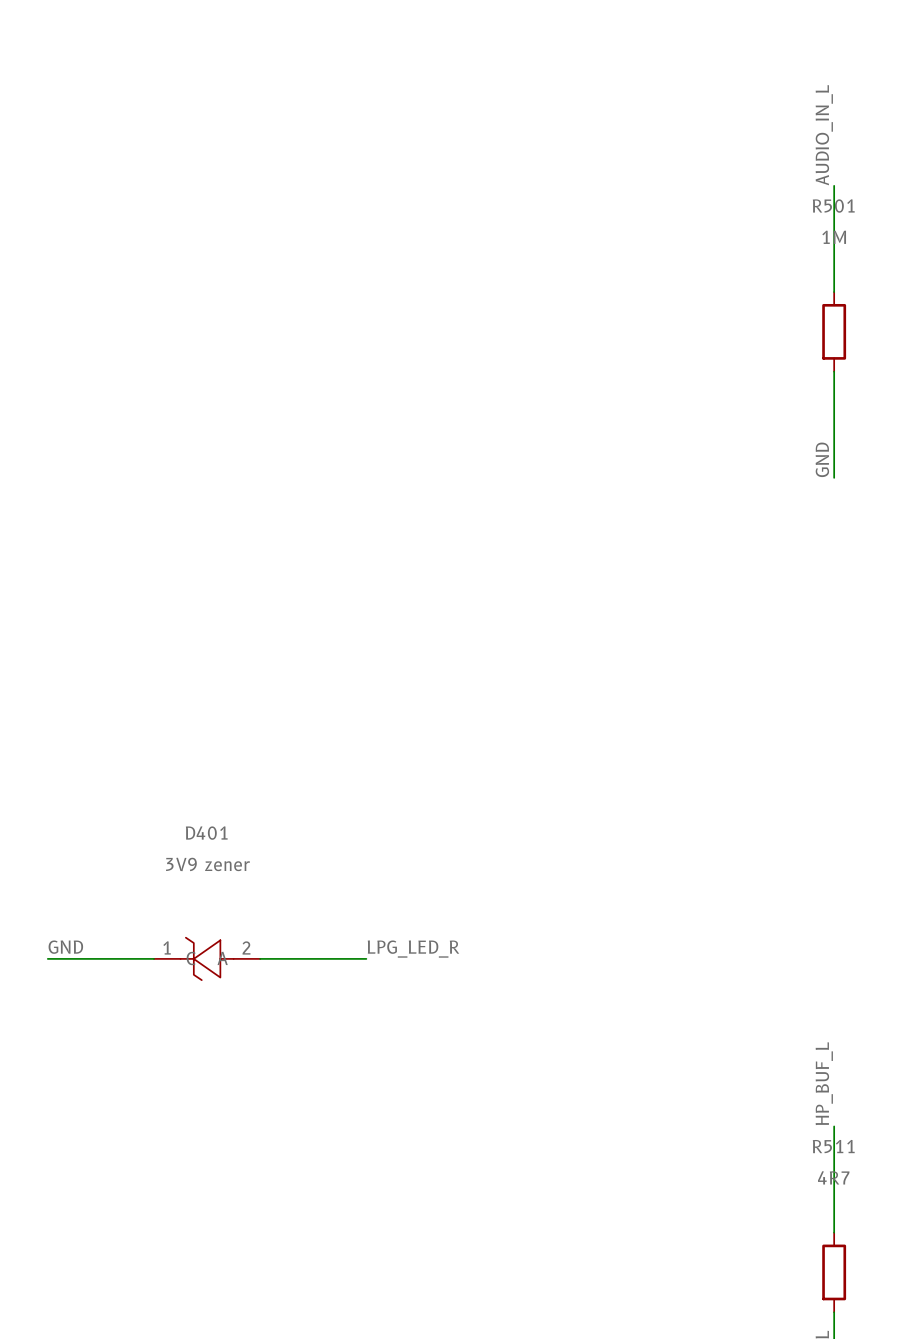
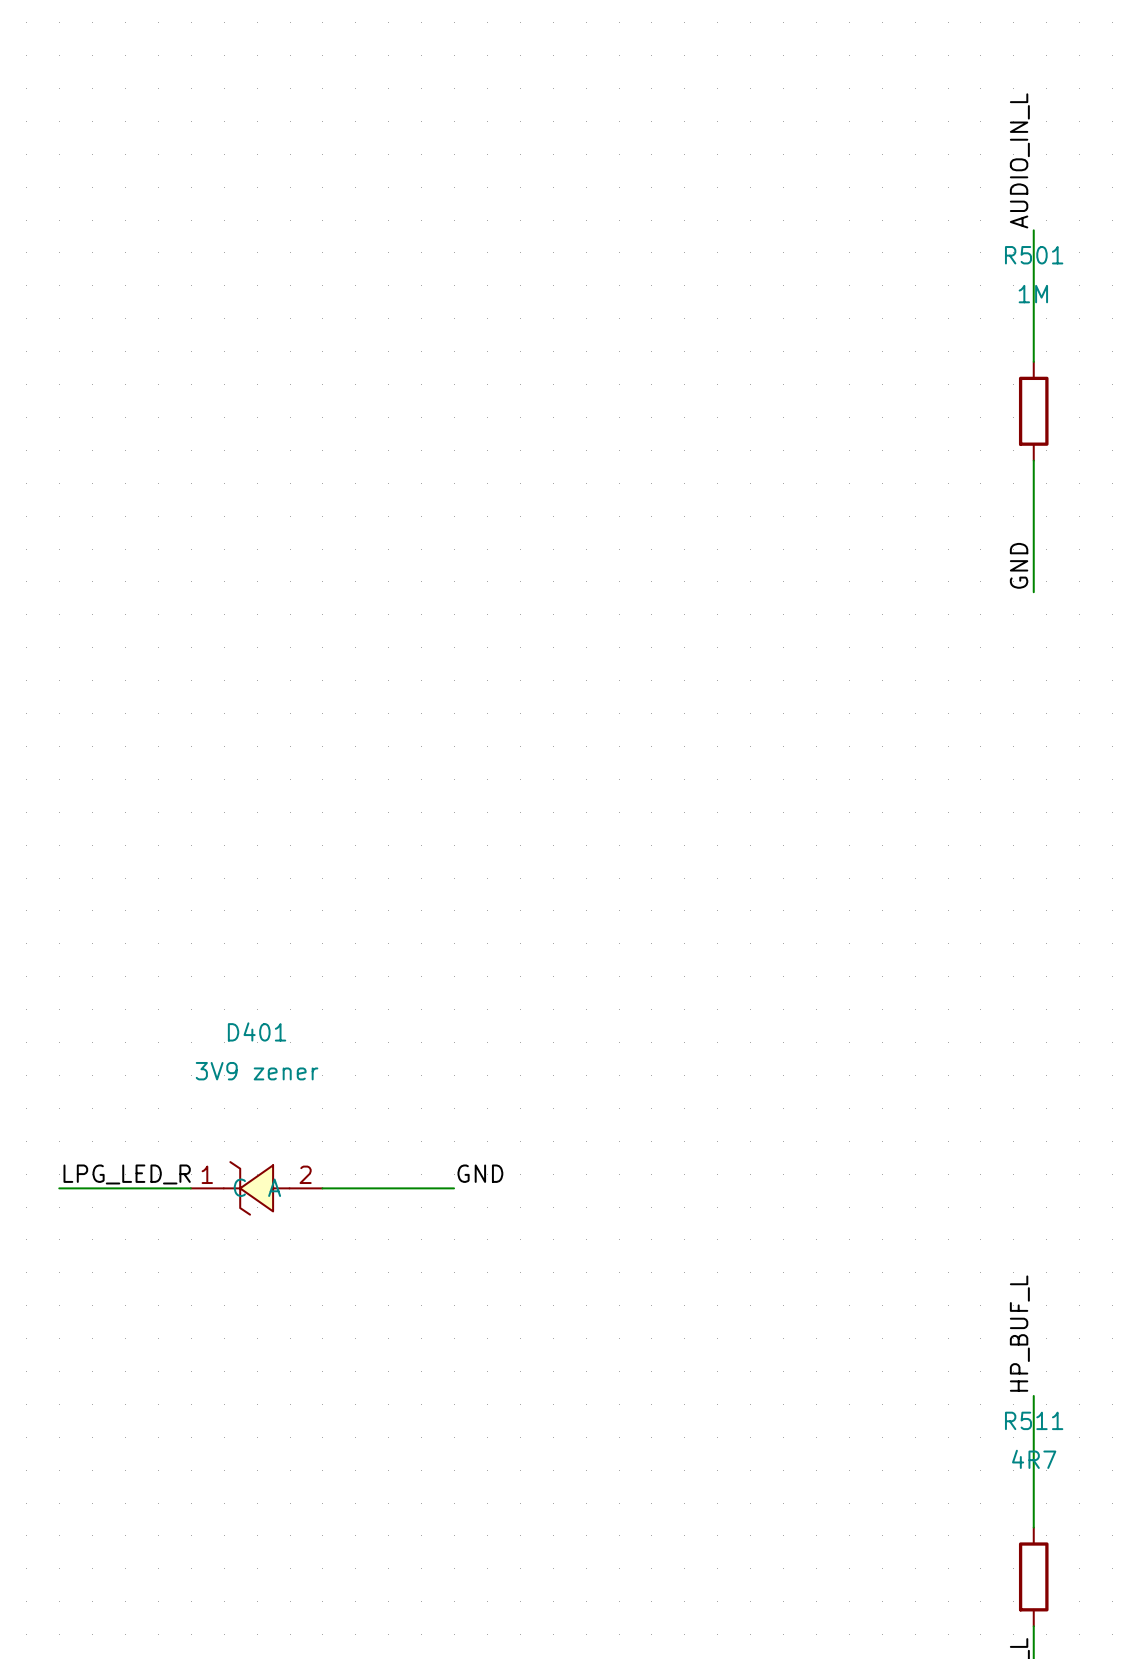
label: GND (65, 947) -> LPG_LED_R (127, 1174)
label: LPG_LED_R (413, 949) -> GND (480, 1173)

